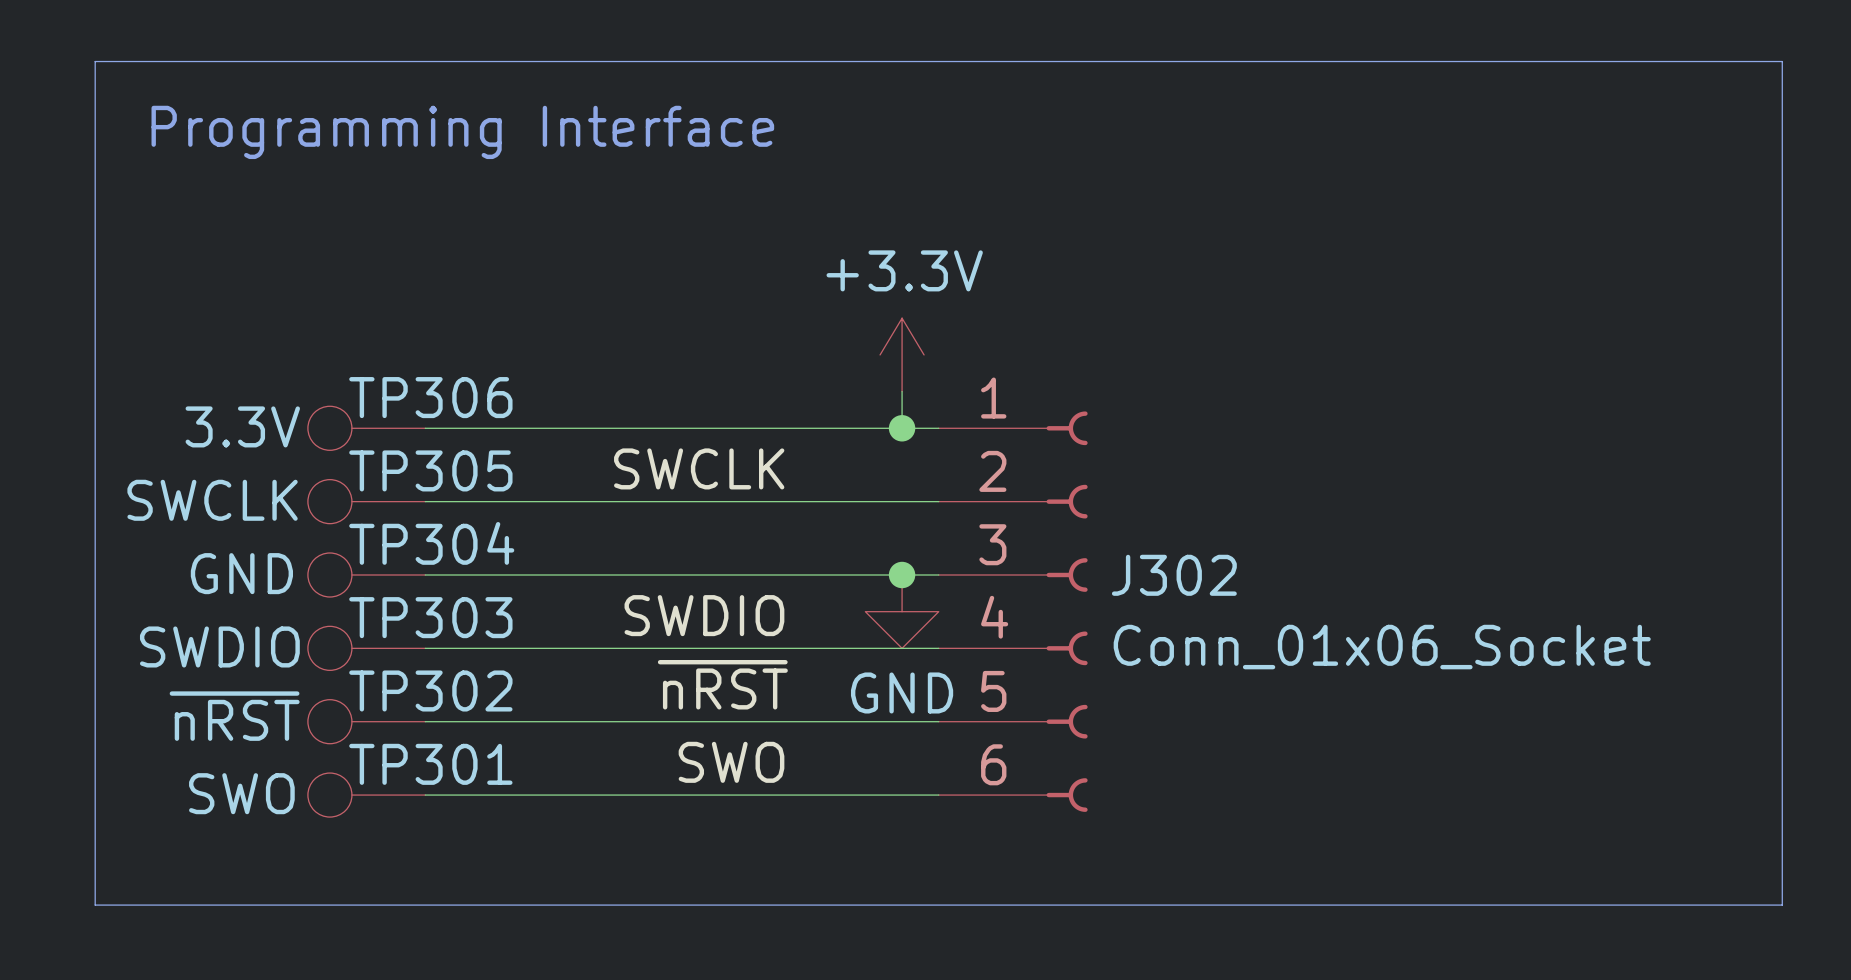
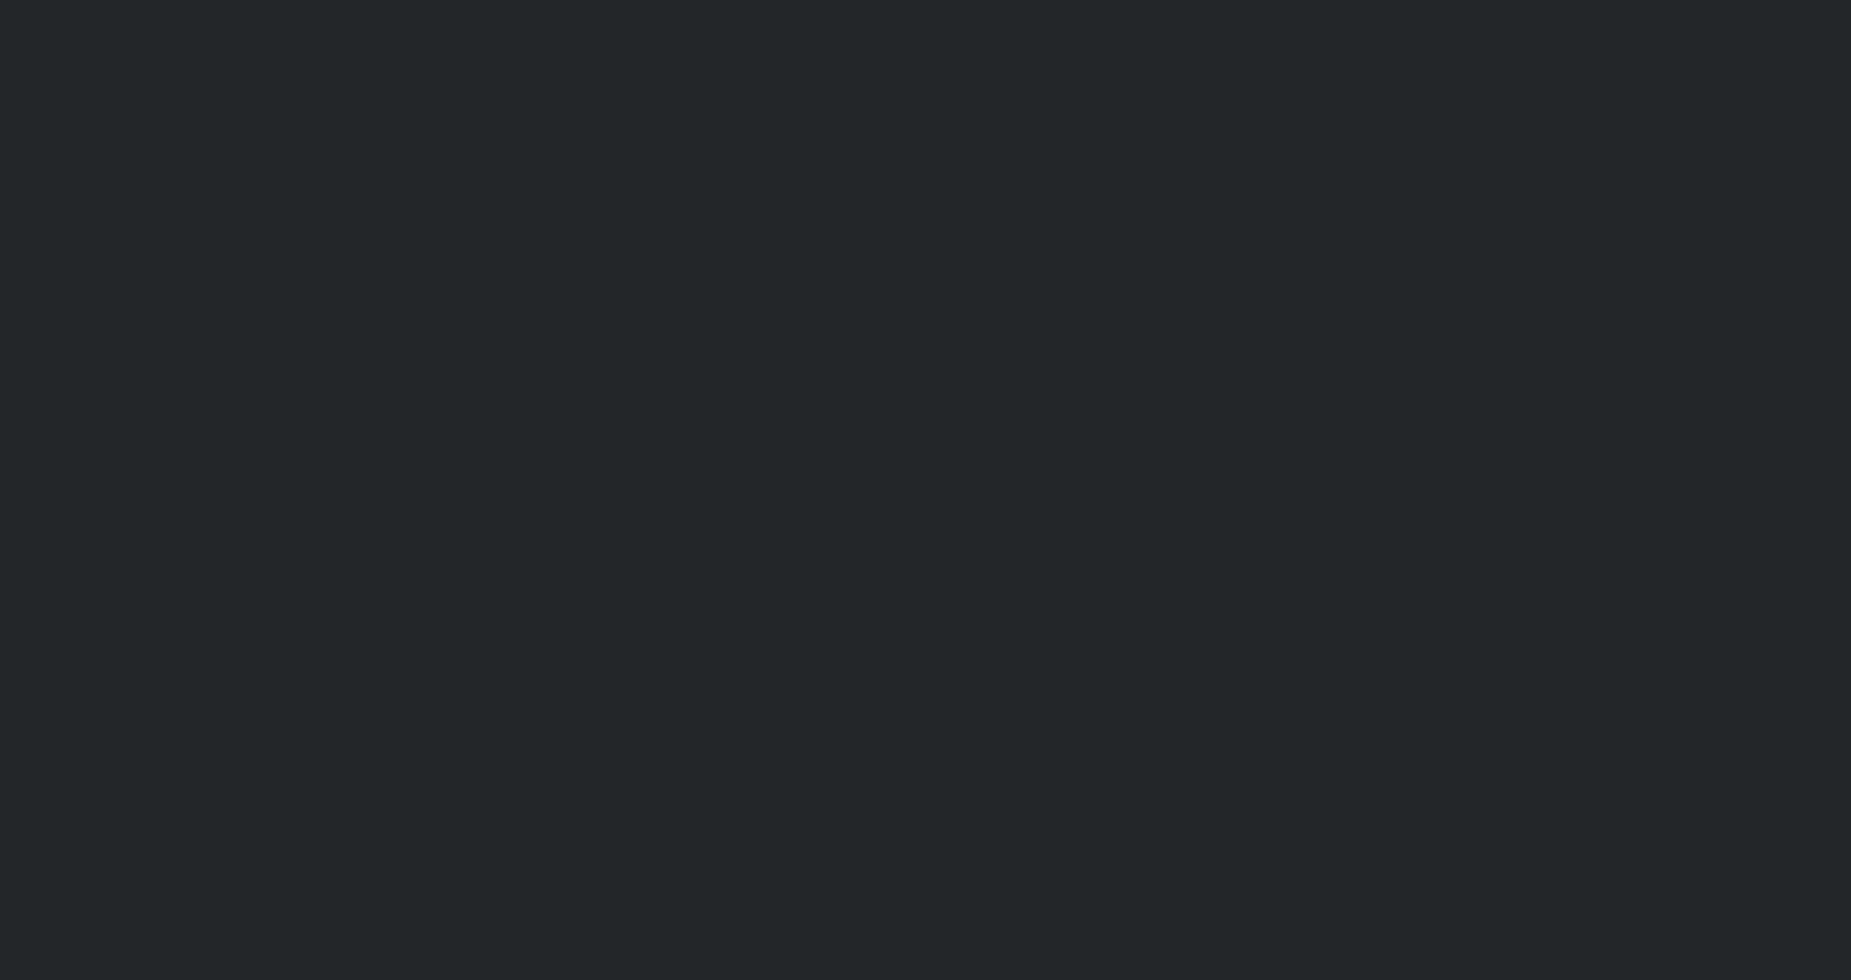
line: (95, 61) (1782, 61) (1782, 905) (95, 905) (95, 61) -> none
text: Programming Interface (462, 132) -> none
power symbol: +3.3V (902, 354) -> none
wire: (902, 391) (902, 428) -> none
TP306: 3.3V (366, 428) -> none
wire: (425, 428) (938, 428) -> none
junction: (902, 428) -> none
label: SWCLK (699, 468) -> none
TP305: SWCLK (366, 501) -> none
wire: (425, 501) (938, 501) -> none
TP304: GND (366, 574) -> none
wire: (425, 574) (938, 574) -> none
junction: (902, 574) -> none
power symbol: GND (902, 611) -> none
J302: Conn_01x06_Socket (1013, 611) -> none
label: SWDIO (704, 615) -> none
TP303: SWDIO (366, 648) -> none
wire: (425, 648) (938, 648) -> none
label: ~{nRST} (722, 684) -> none
TP302: ~{nRST} (366, 721) -> none
wire: (425, 721) (938, 721) -> none
label: SWO (731, 762) -> none
TP301: SWO (366, 795) -> none
wire: (425, 795) (938, 795) -> none

